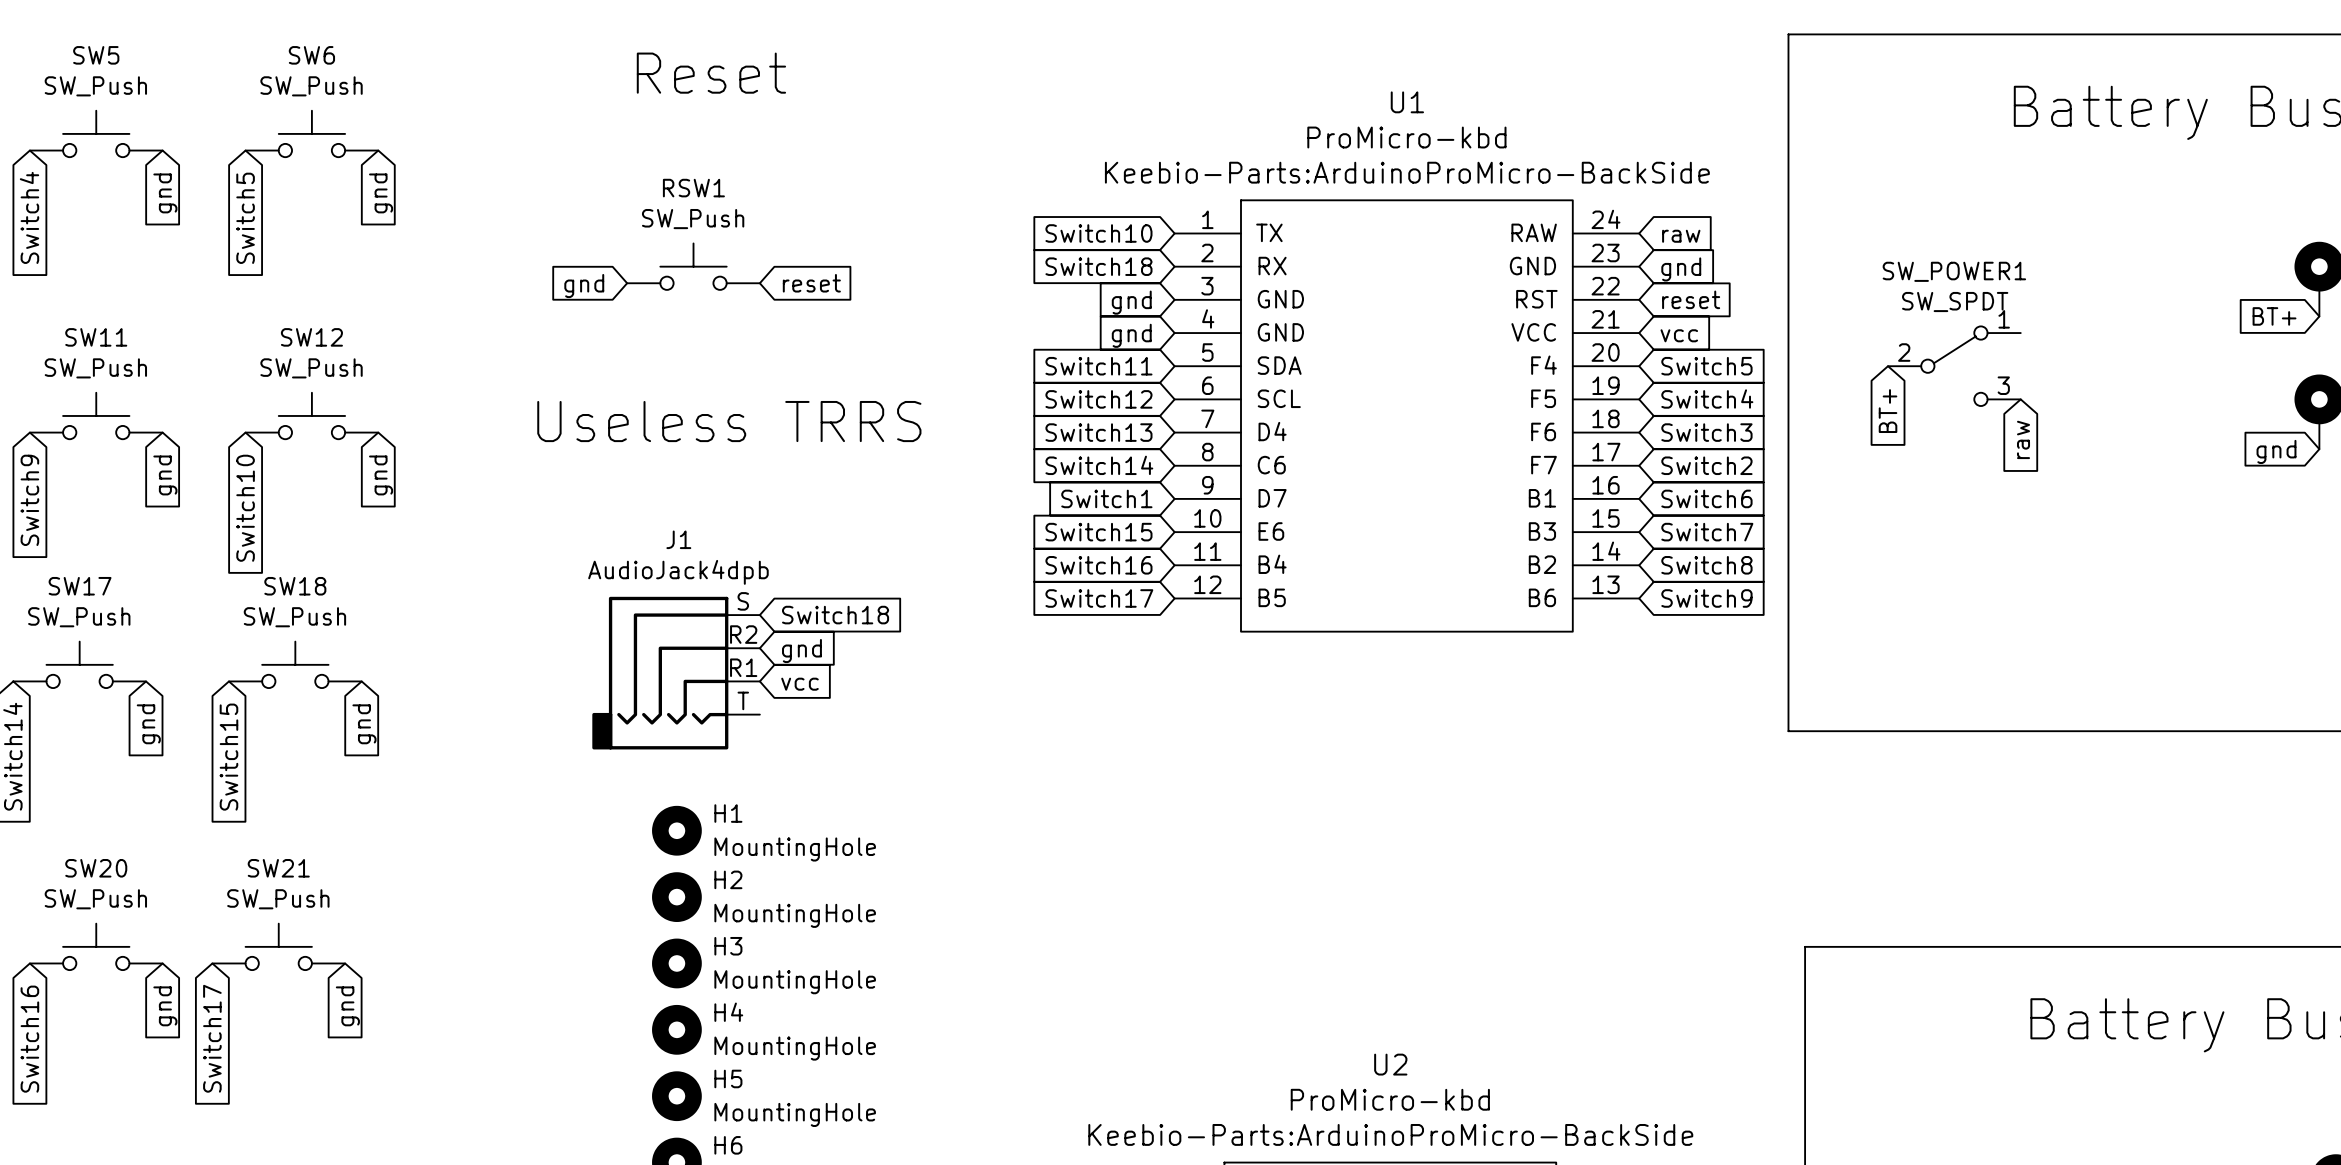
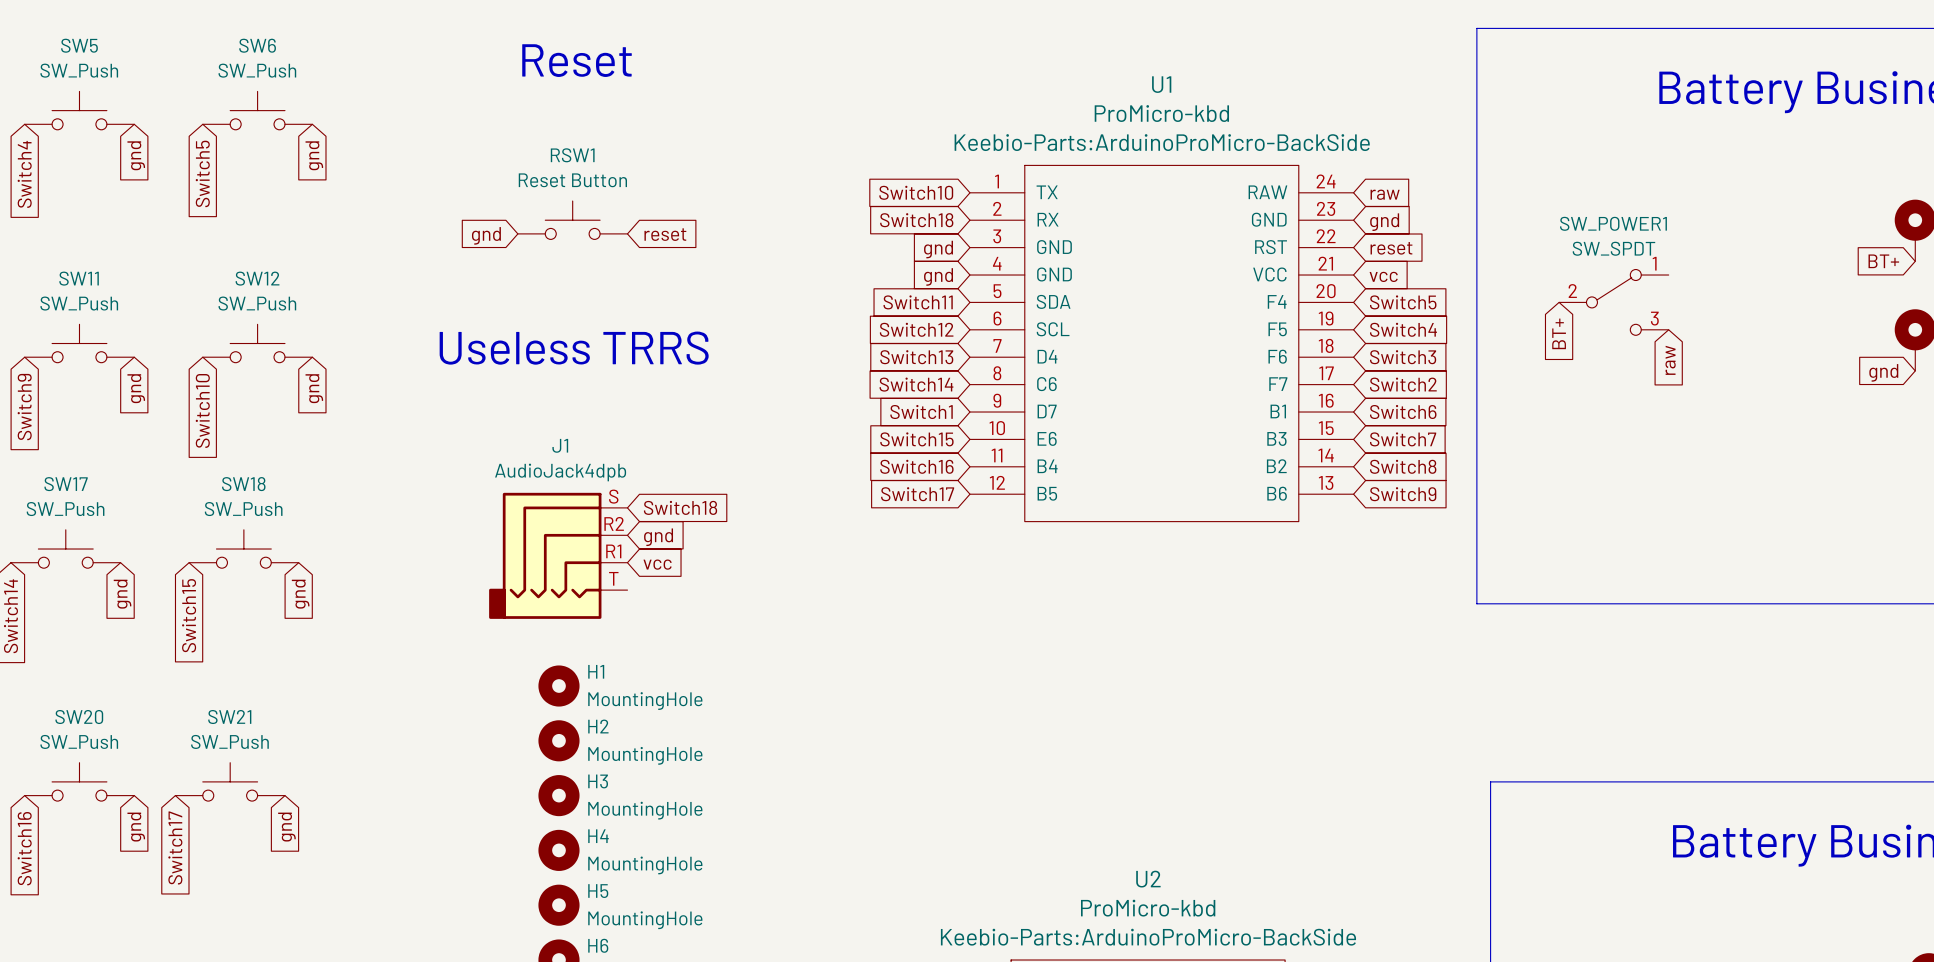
RSW1 value: SW_Push (693, 219) -> Reset Button (572, 180)

